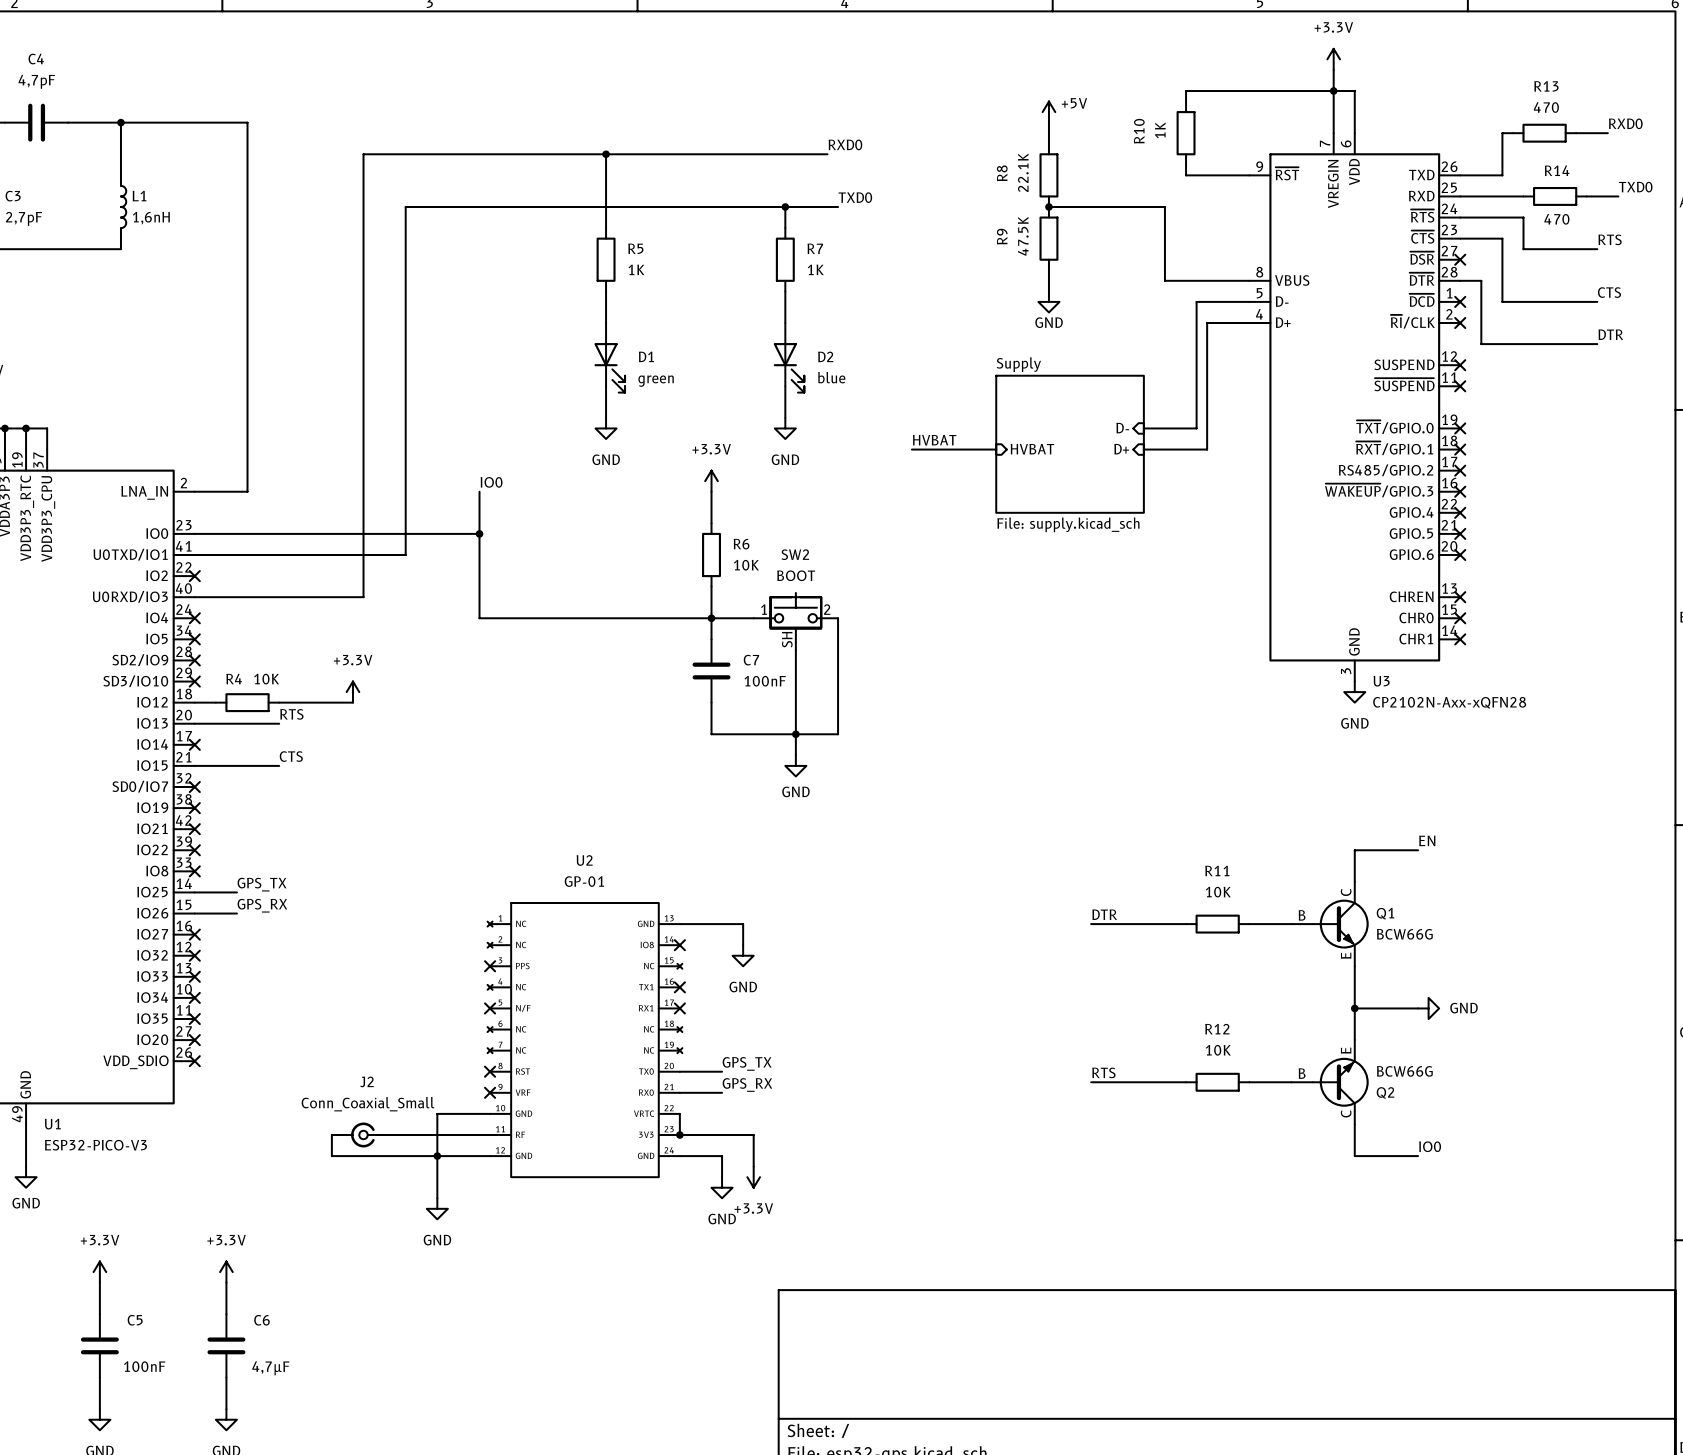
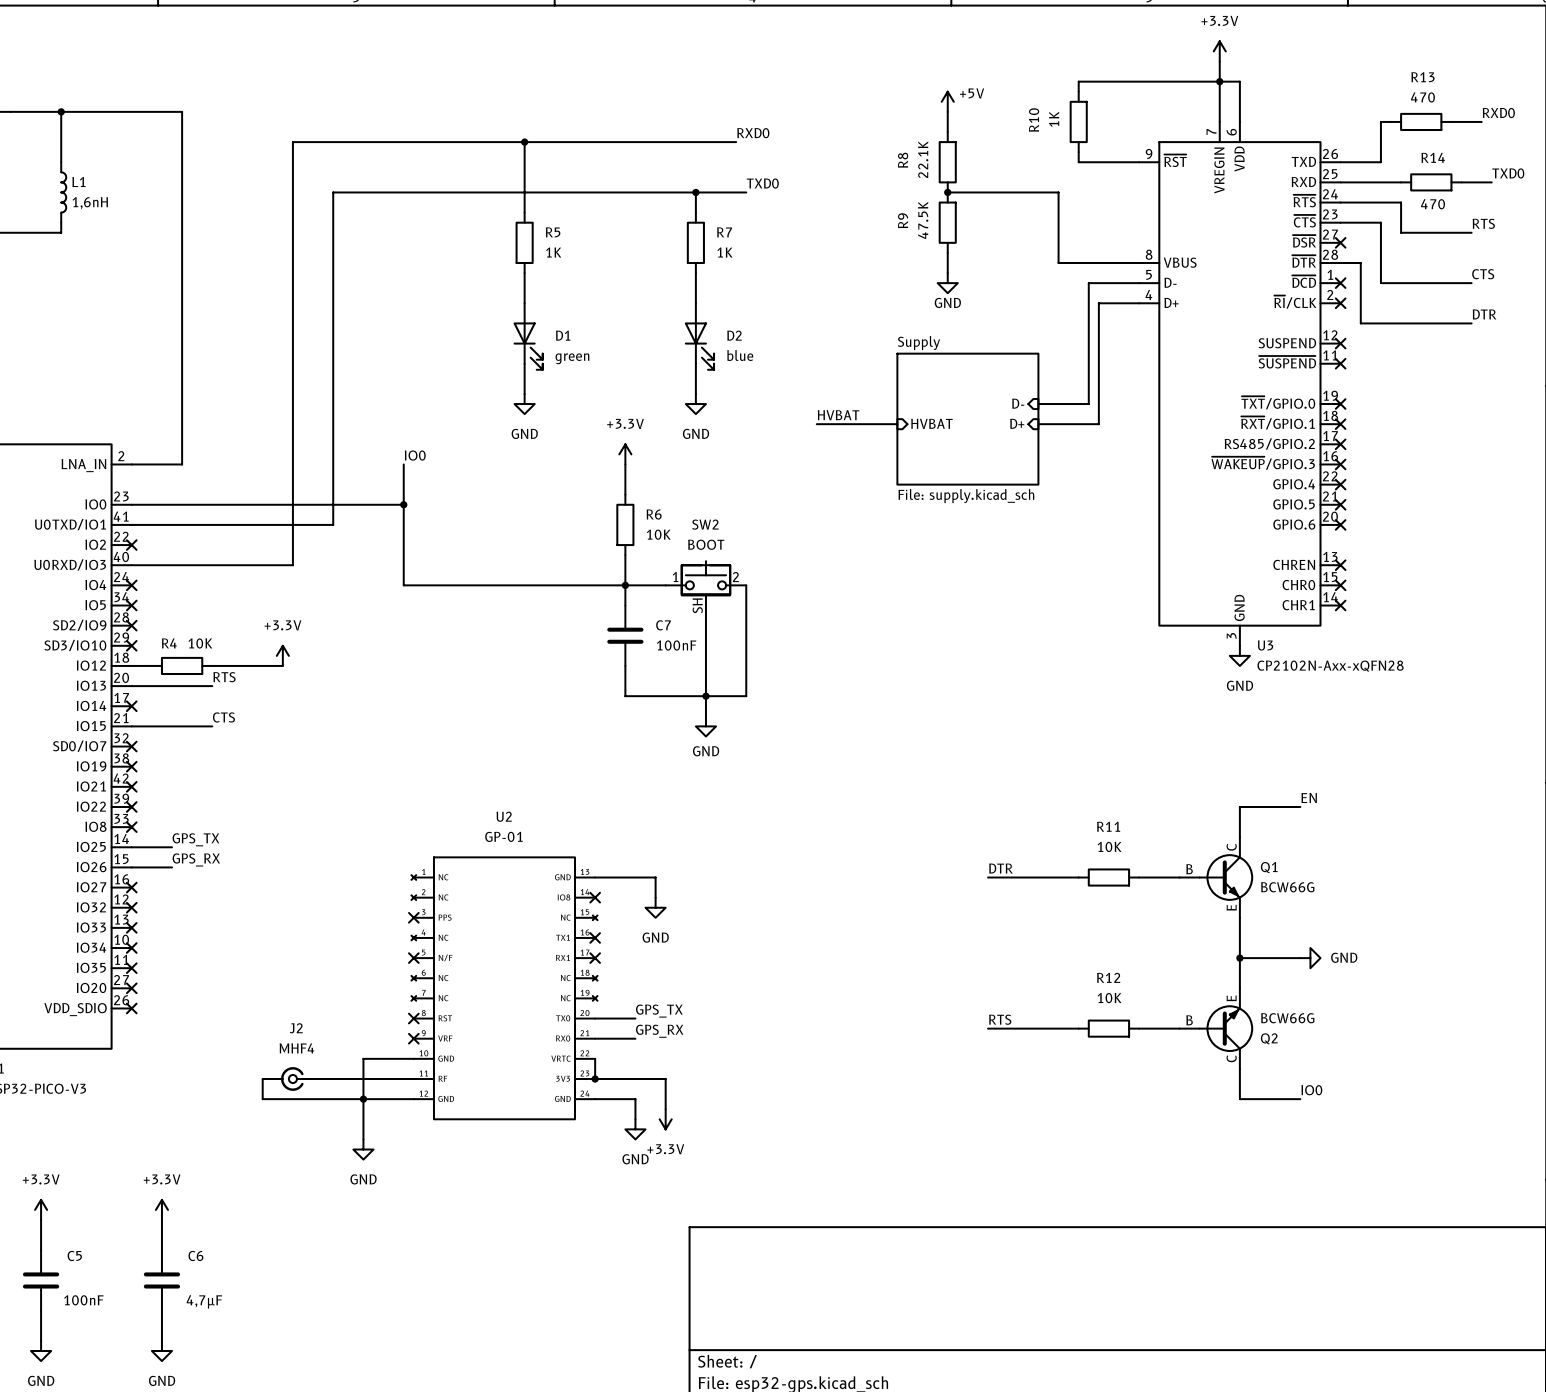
J2 value: Conn_Coaxial_Small (368, 1104) -> MHF4 (296, 1048)

